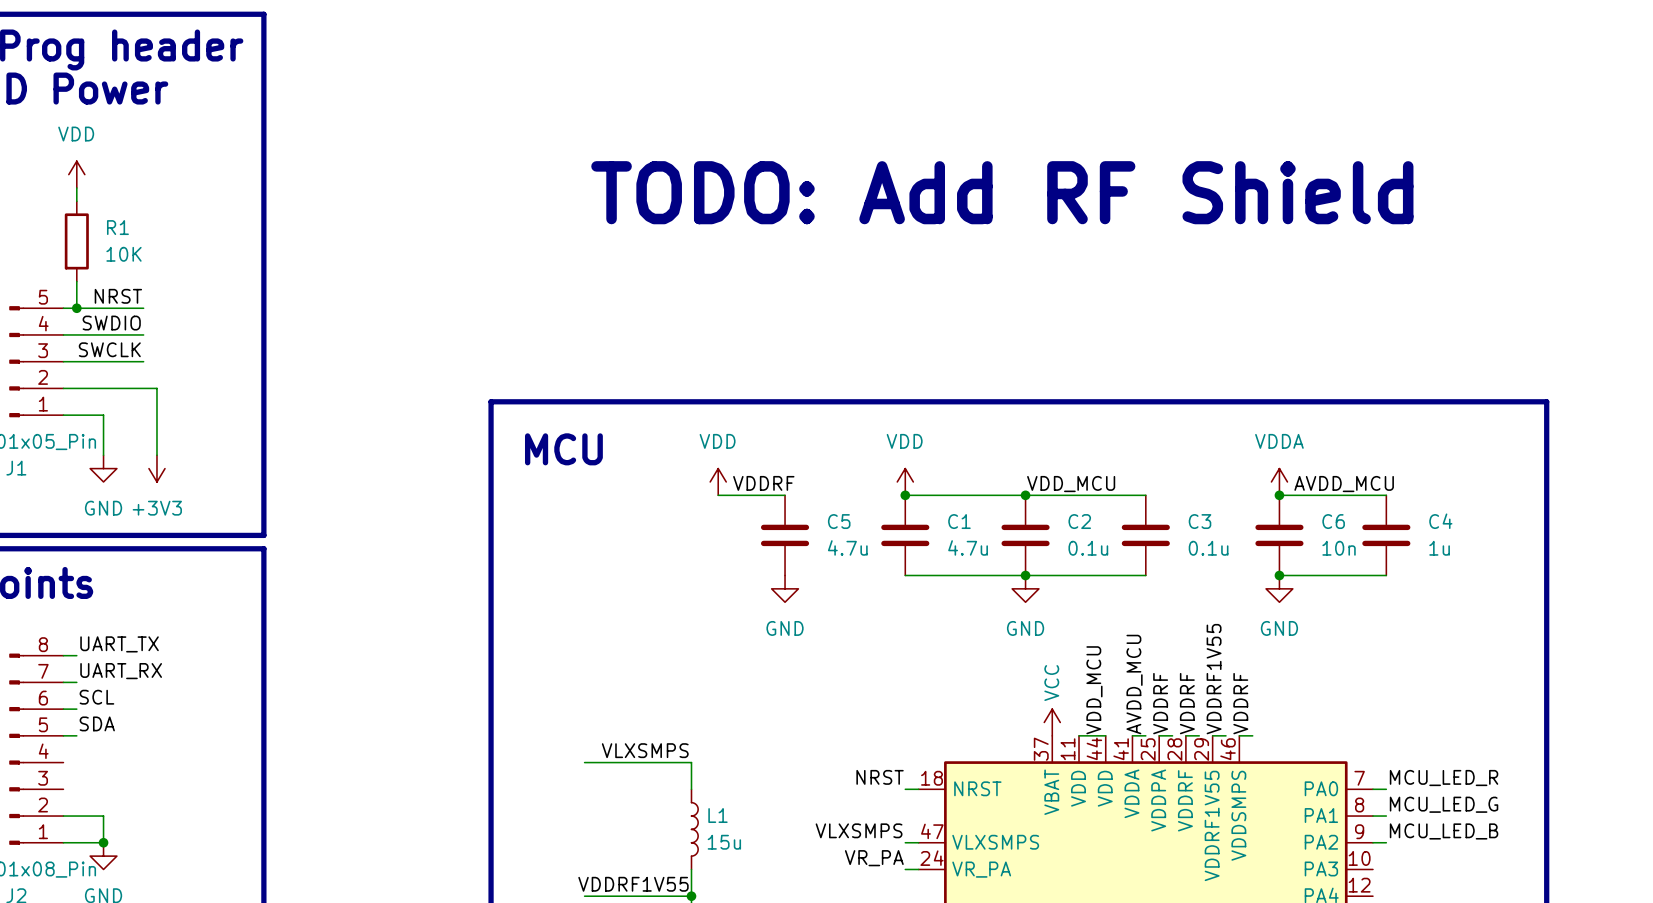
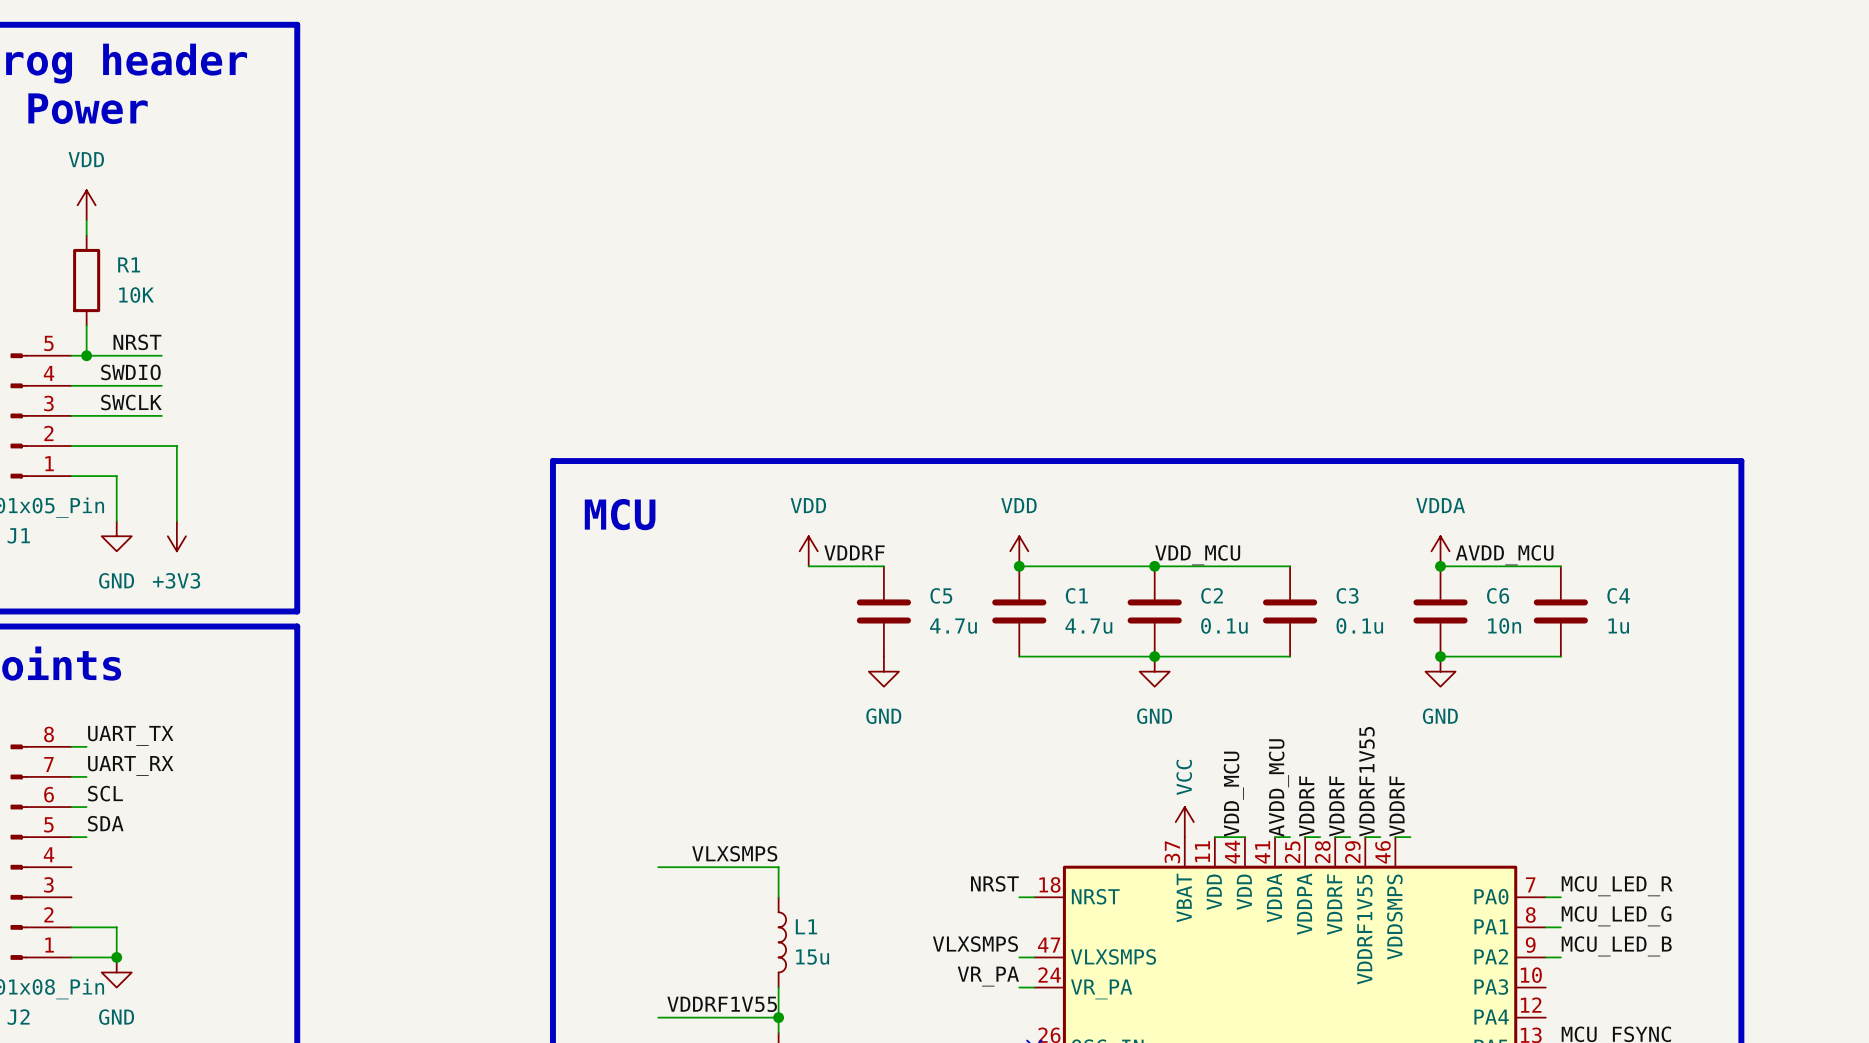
text: TODO: Add RF Shield (1002, 192) -> none

